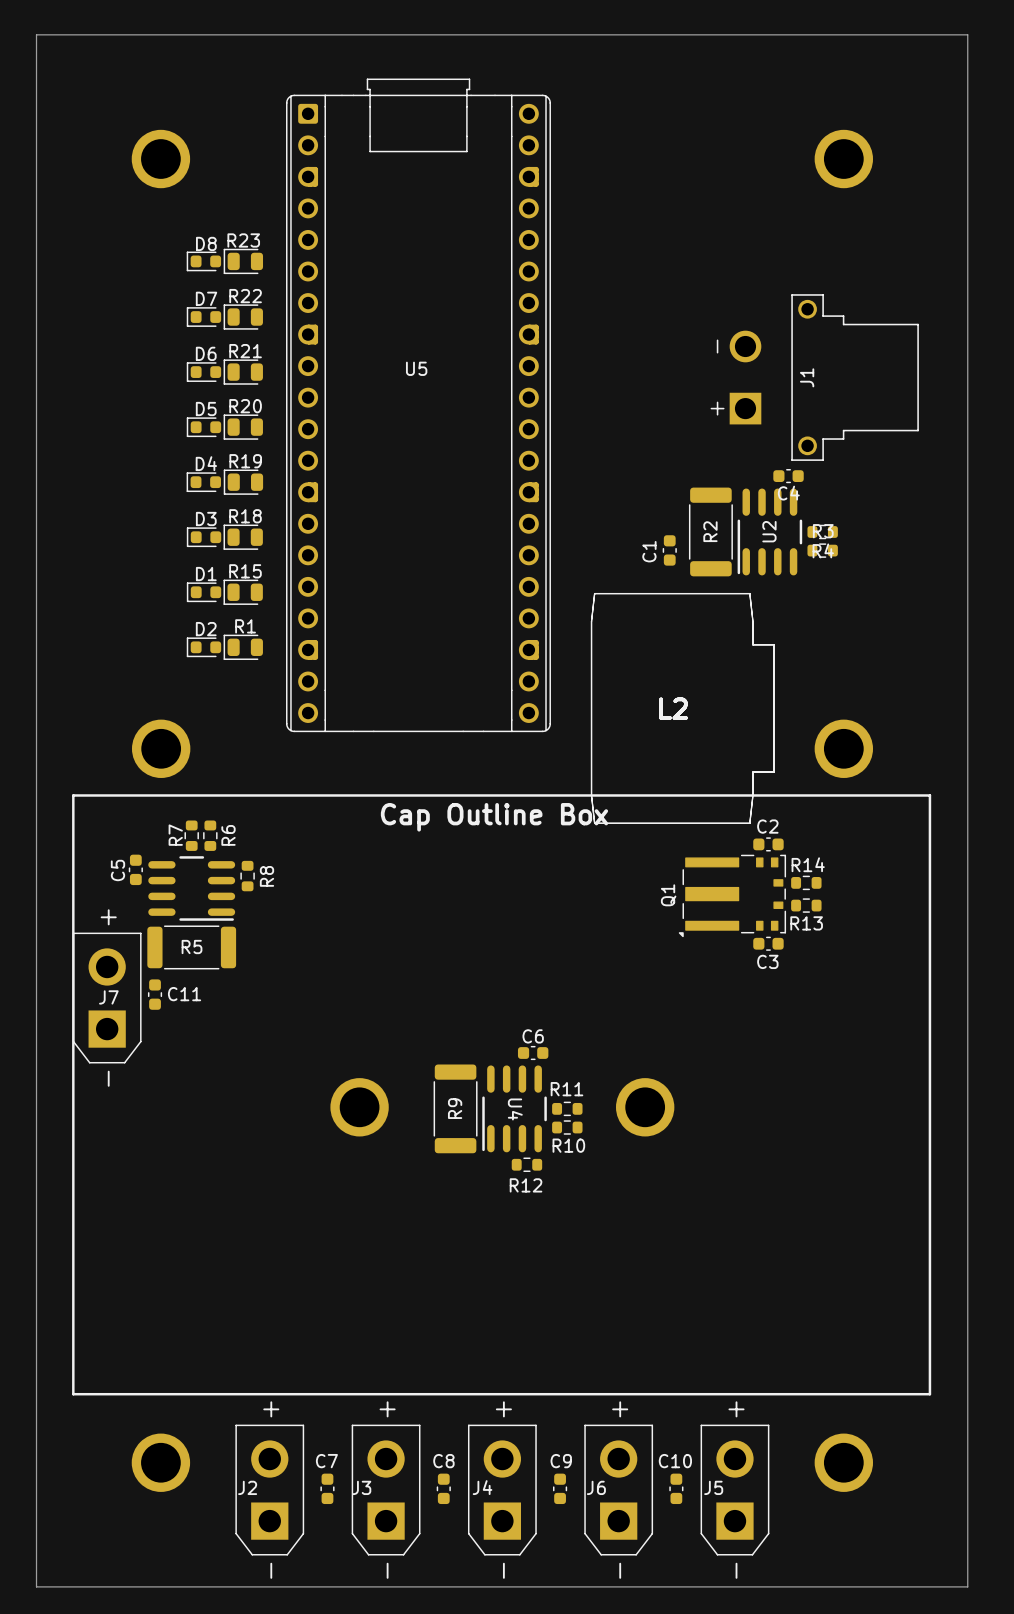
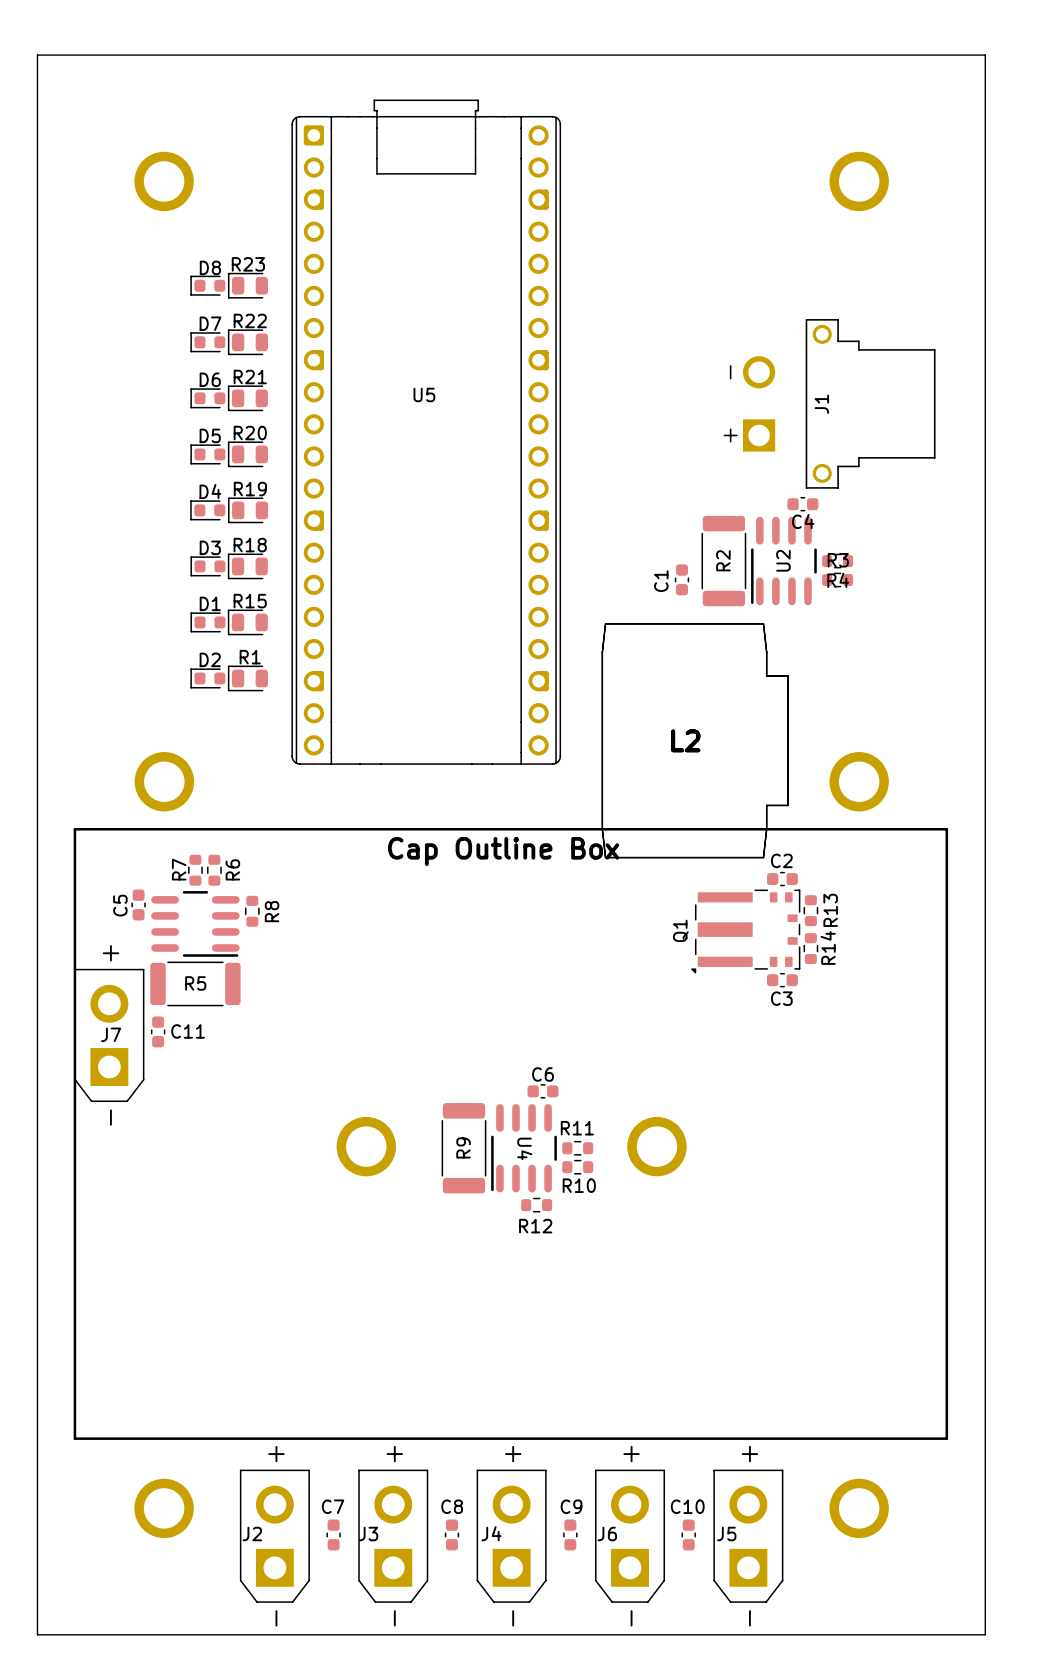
R13 rotation: 0° (806, 882) -> 90° clockwise (810, 910)
R14 rotation: 0° (806, 905) -> 90° clockwise (810, 948)
R13 name position: R13 (806, 923) -> R13 (830, 910)

